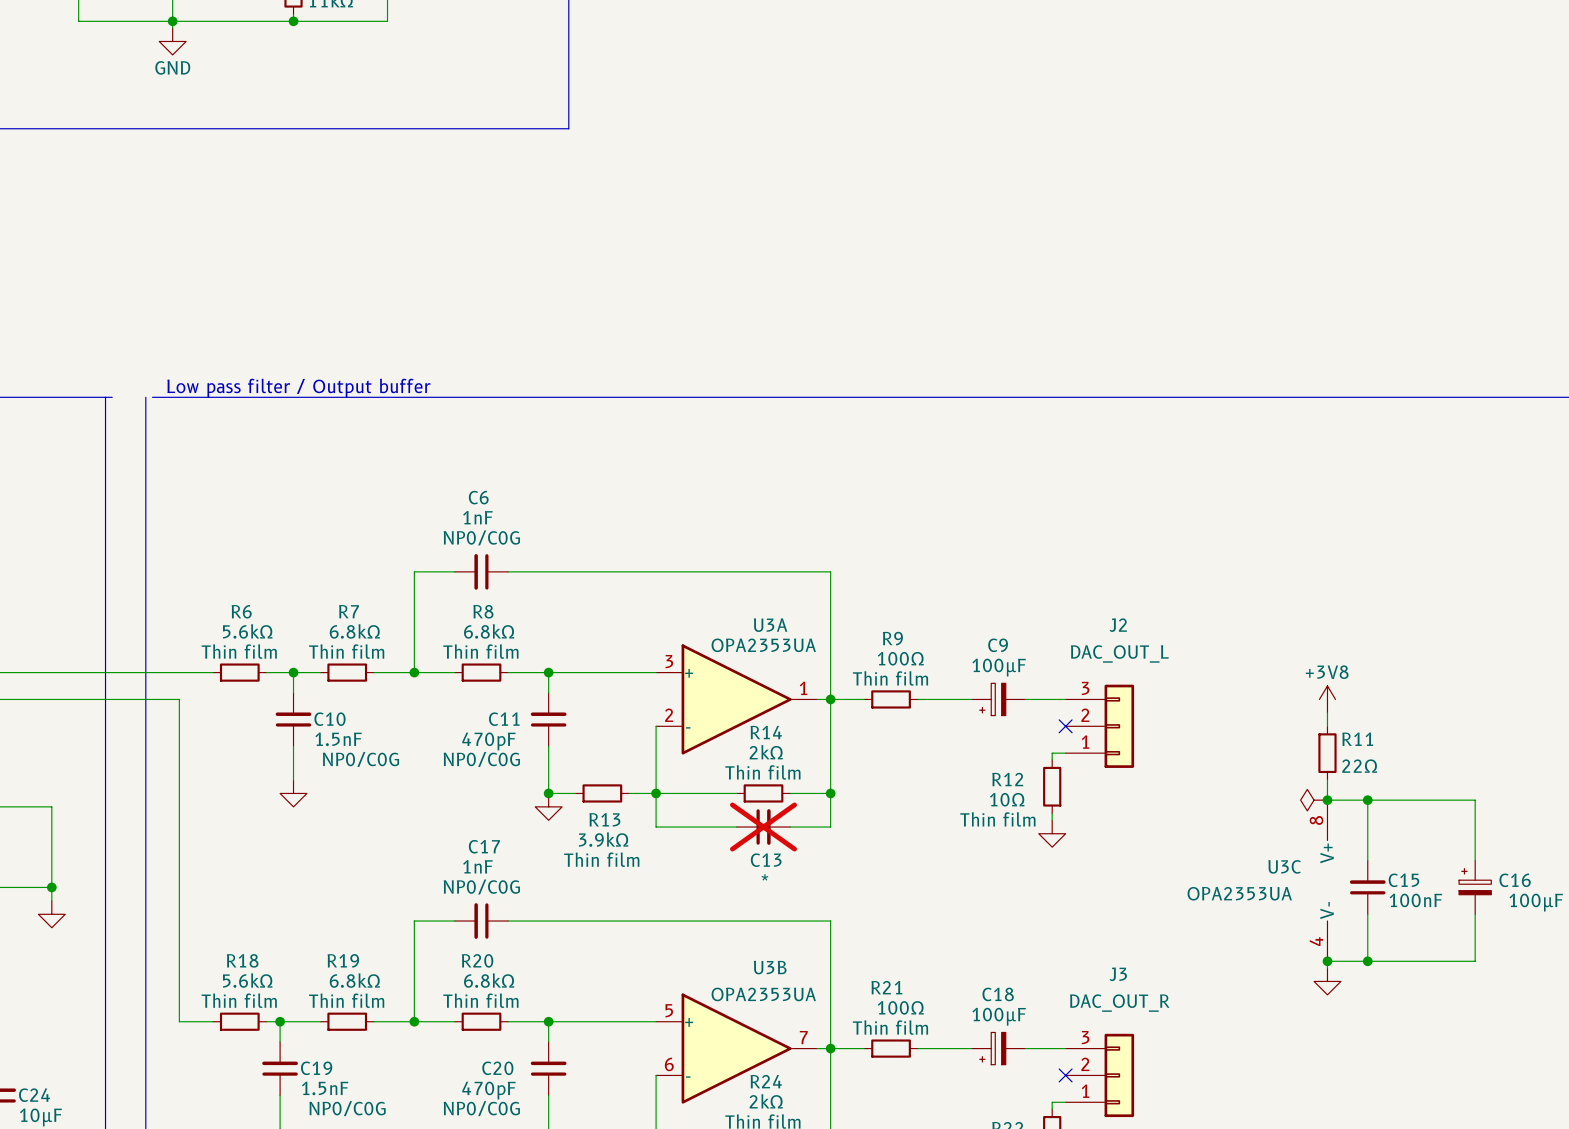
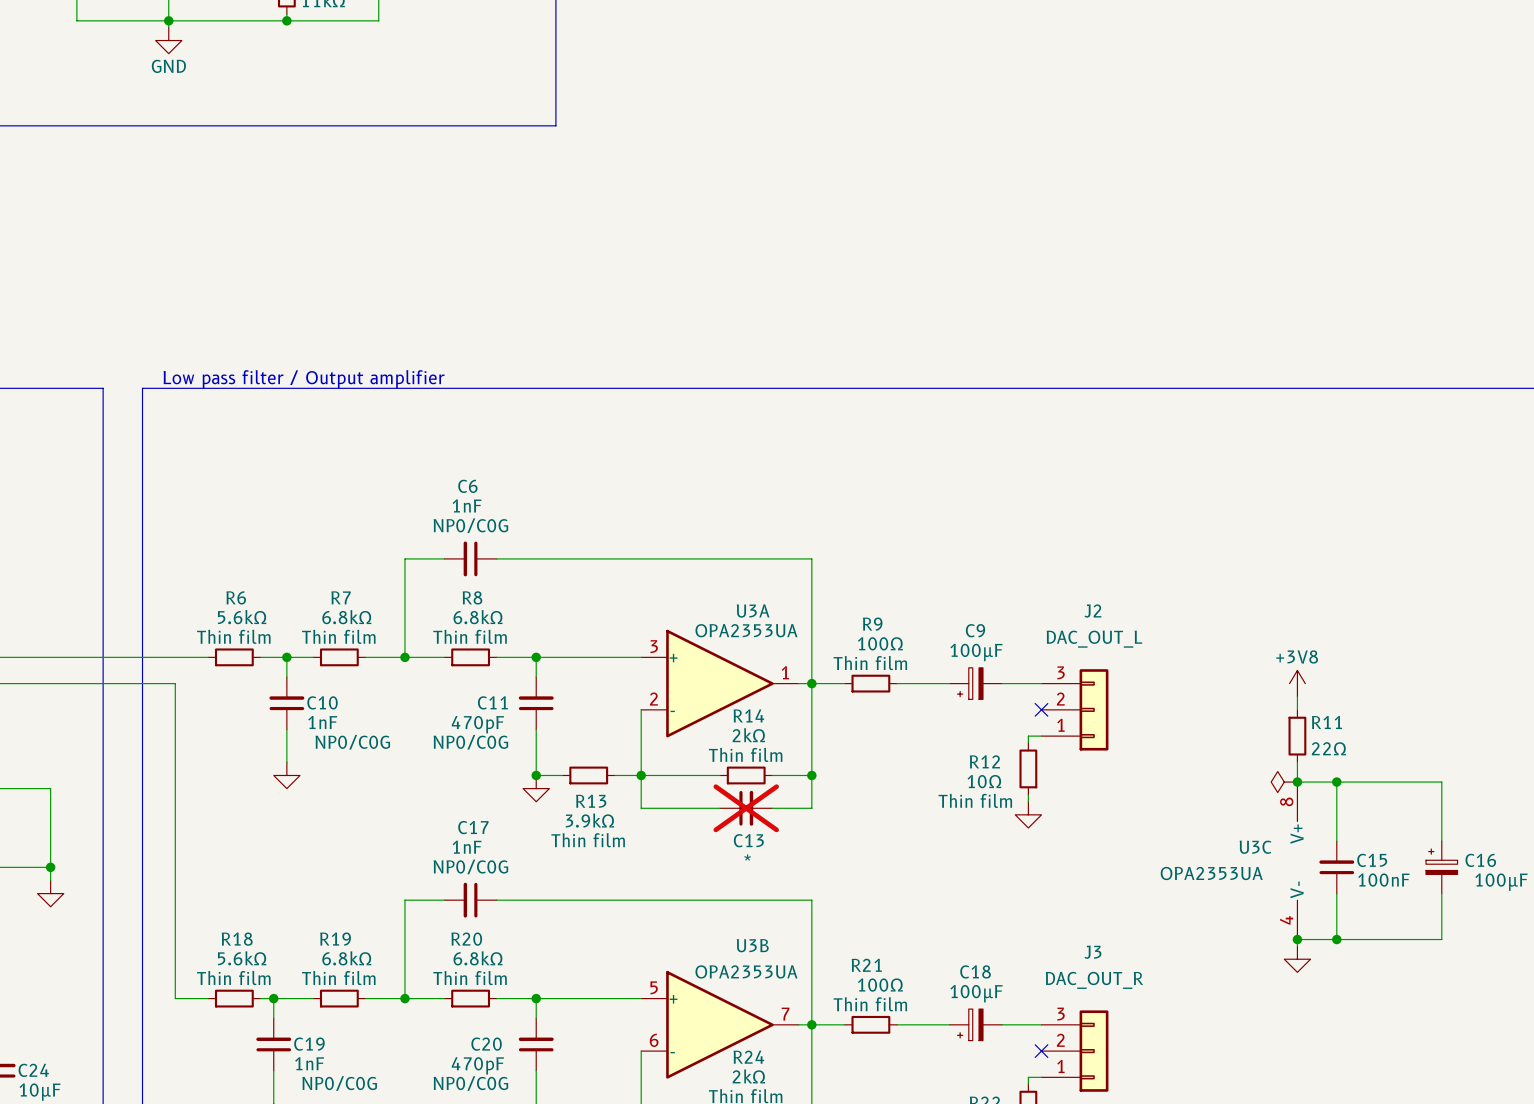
text: Low pass filter / Output buffer (298, 388) -> Low pass filter / Output amplifier (304, 379)
line: (105, 397) (112, 397) -> (142, 388) (149, 388)
C10 value: 1.5nF (338, 739) -> 1nF (322, 722)
C19 value: 1.5nF (325, 1088) -> 1nF (309, 1063)

